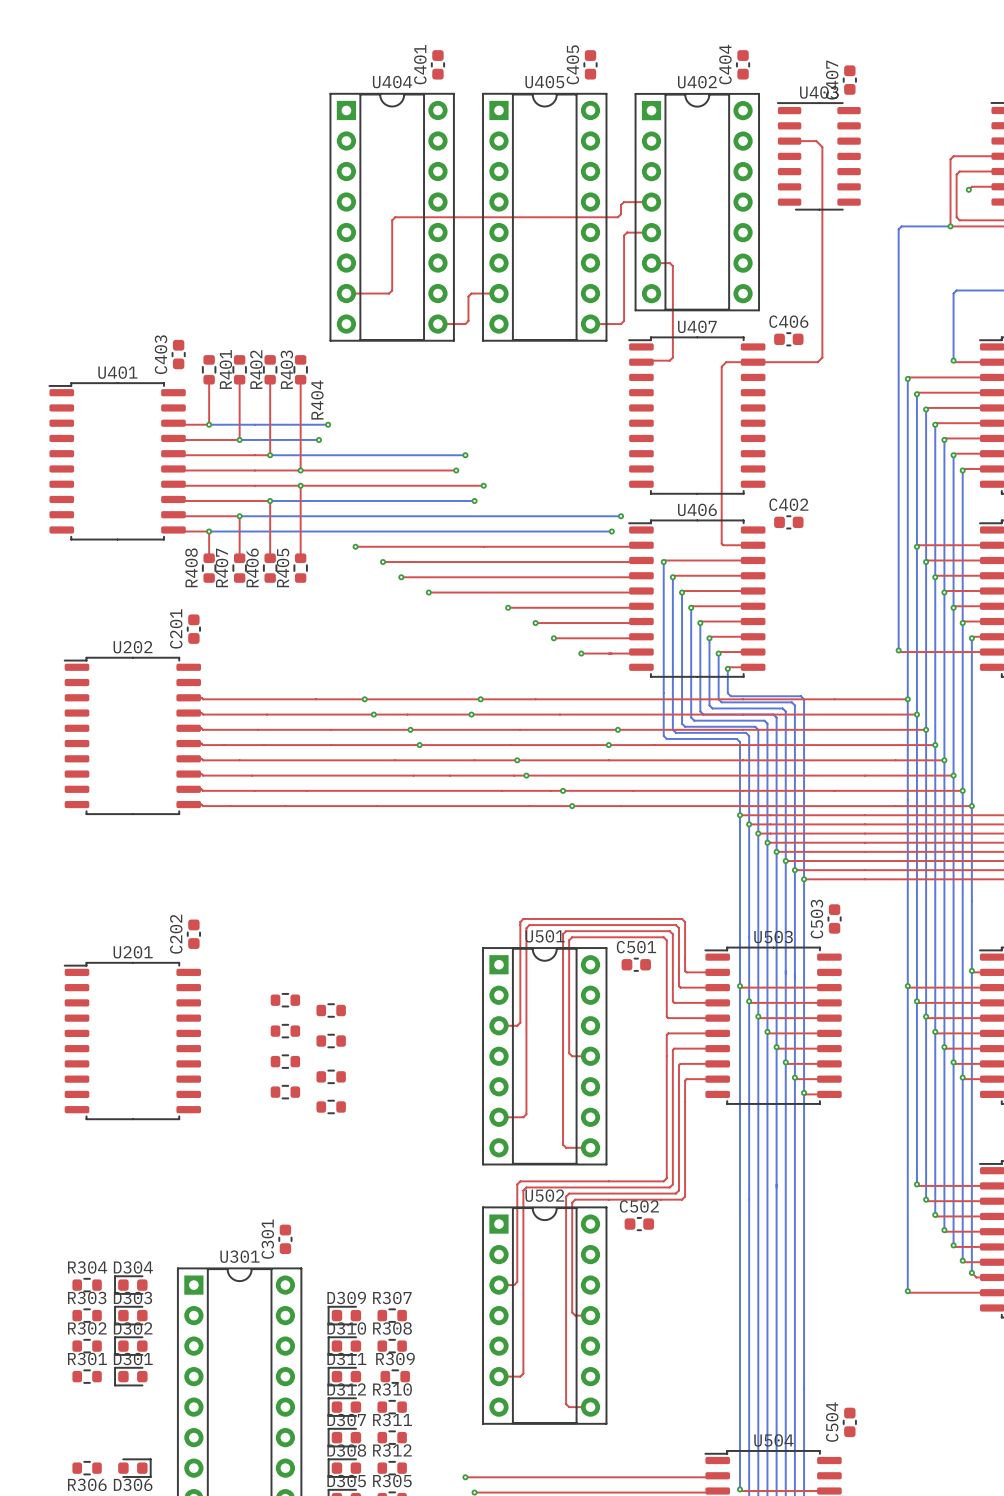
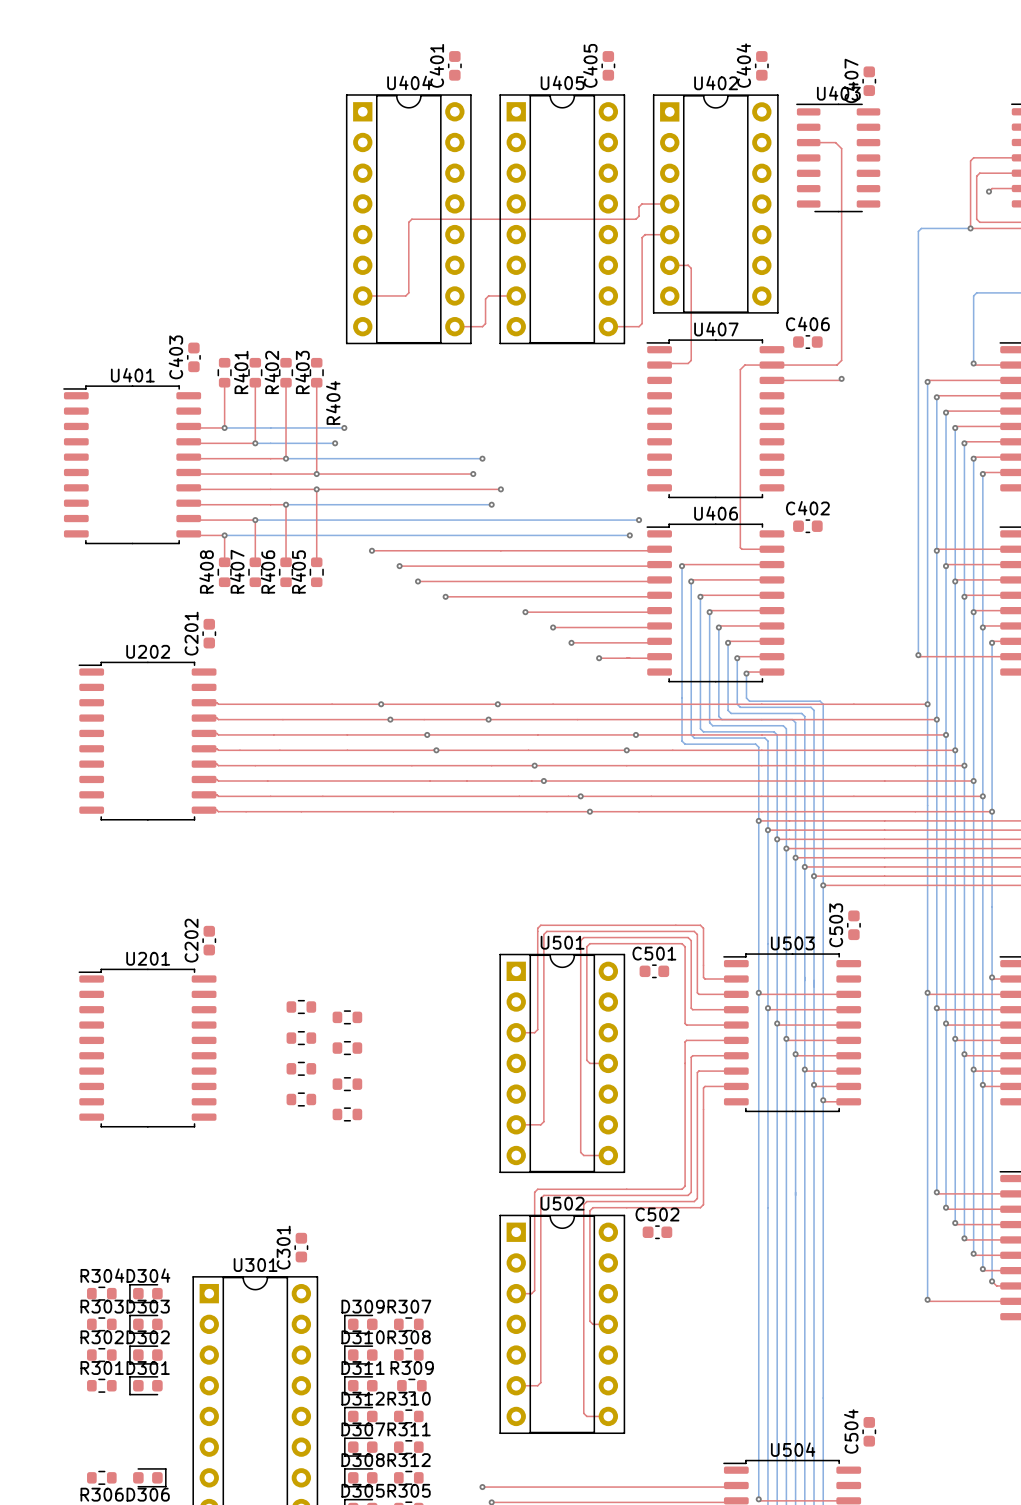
top track: none -> (841, 378) (840, 380) (771, 380)
via: none -> (841, 378)

